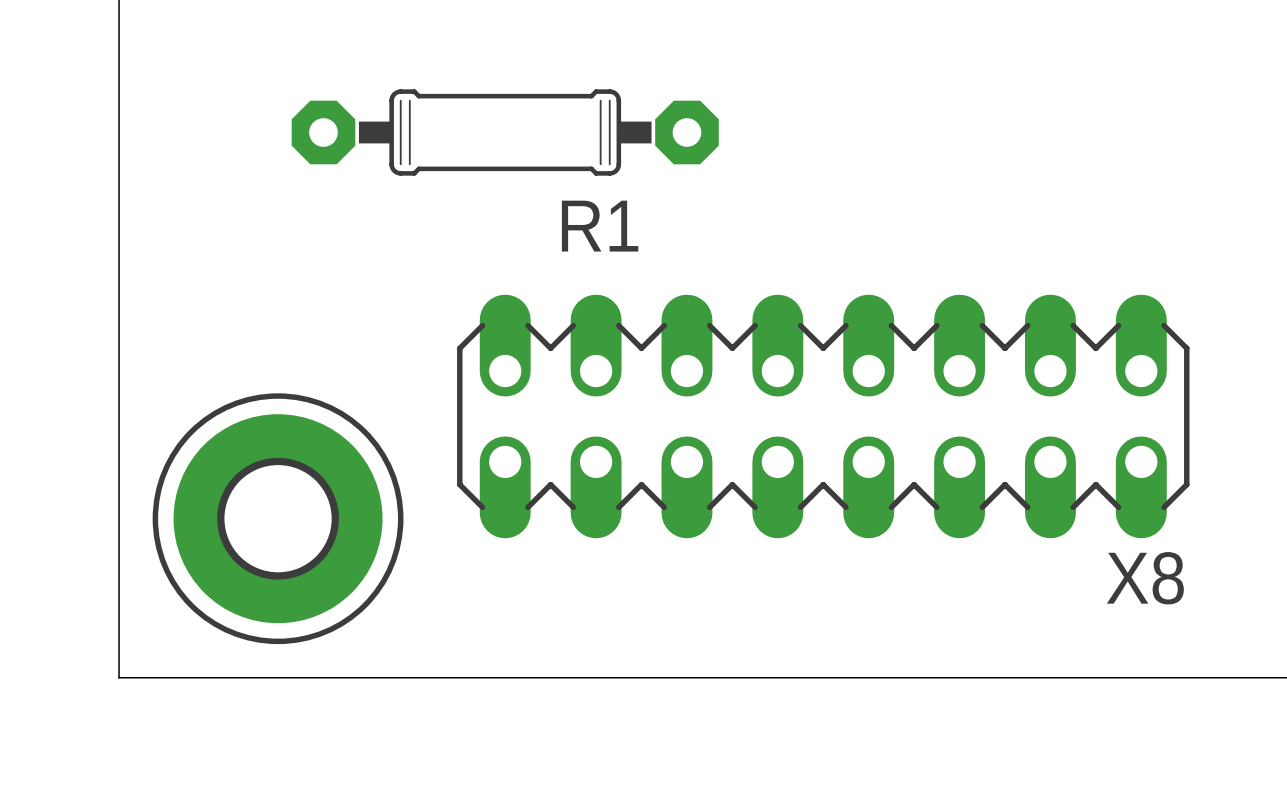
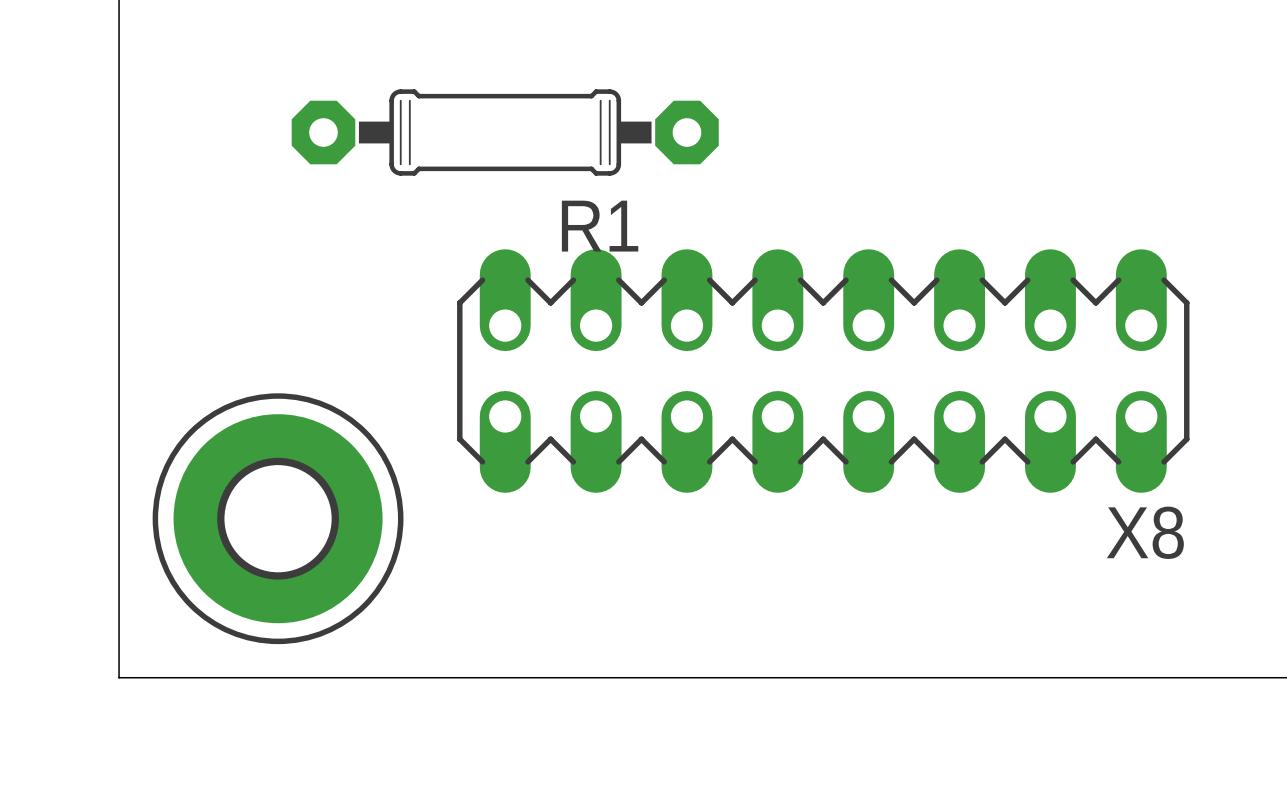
X8 position: (823, 416) -> (823, 371)

